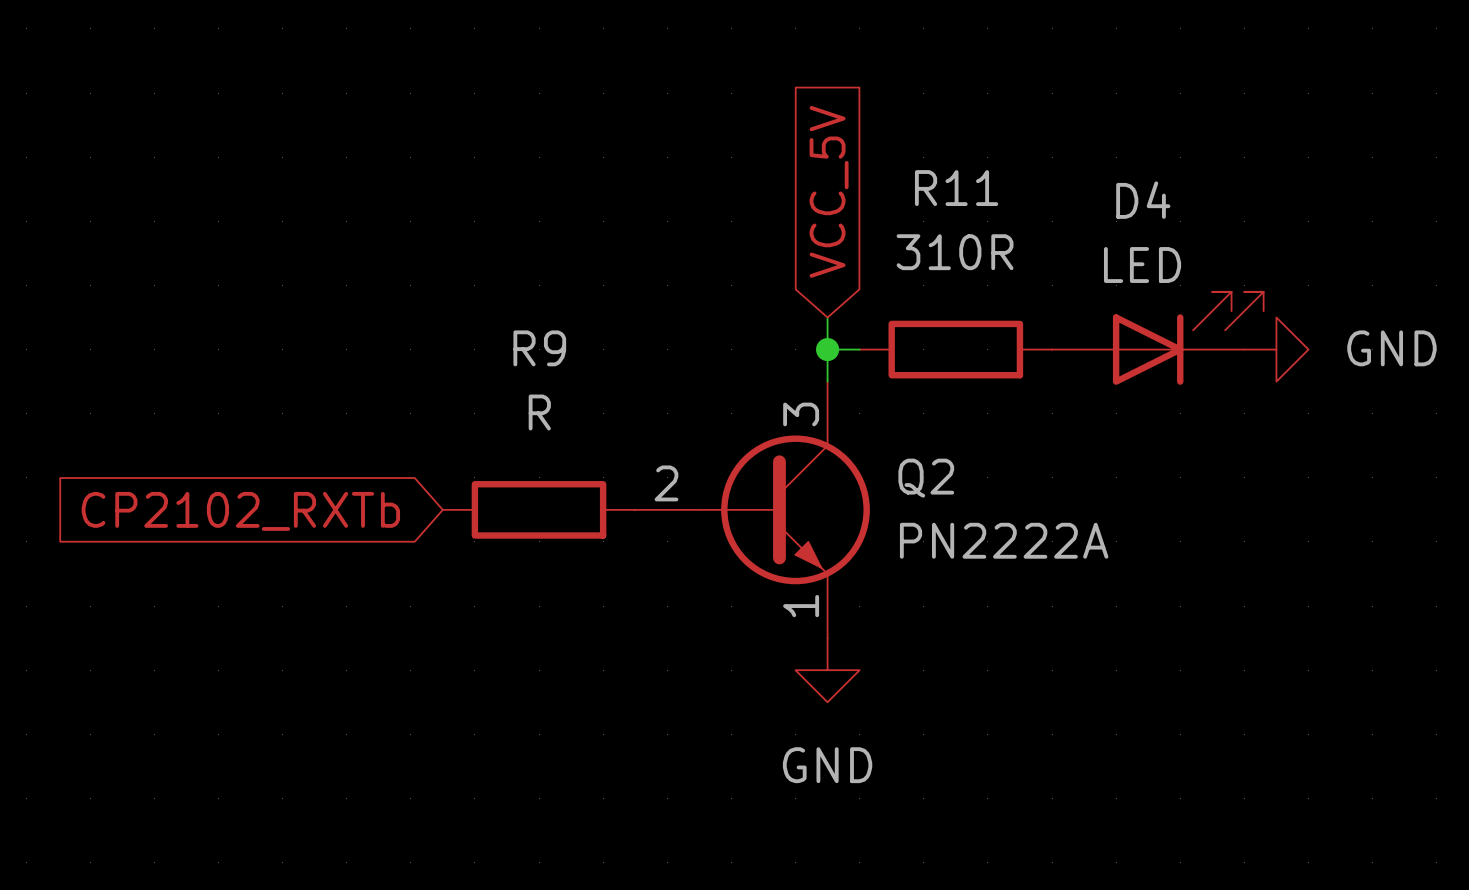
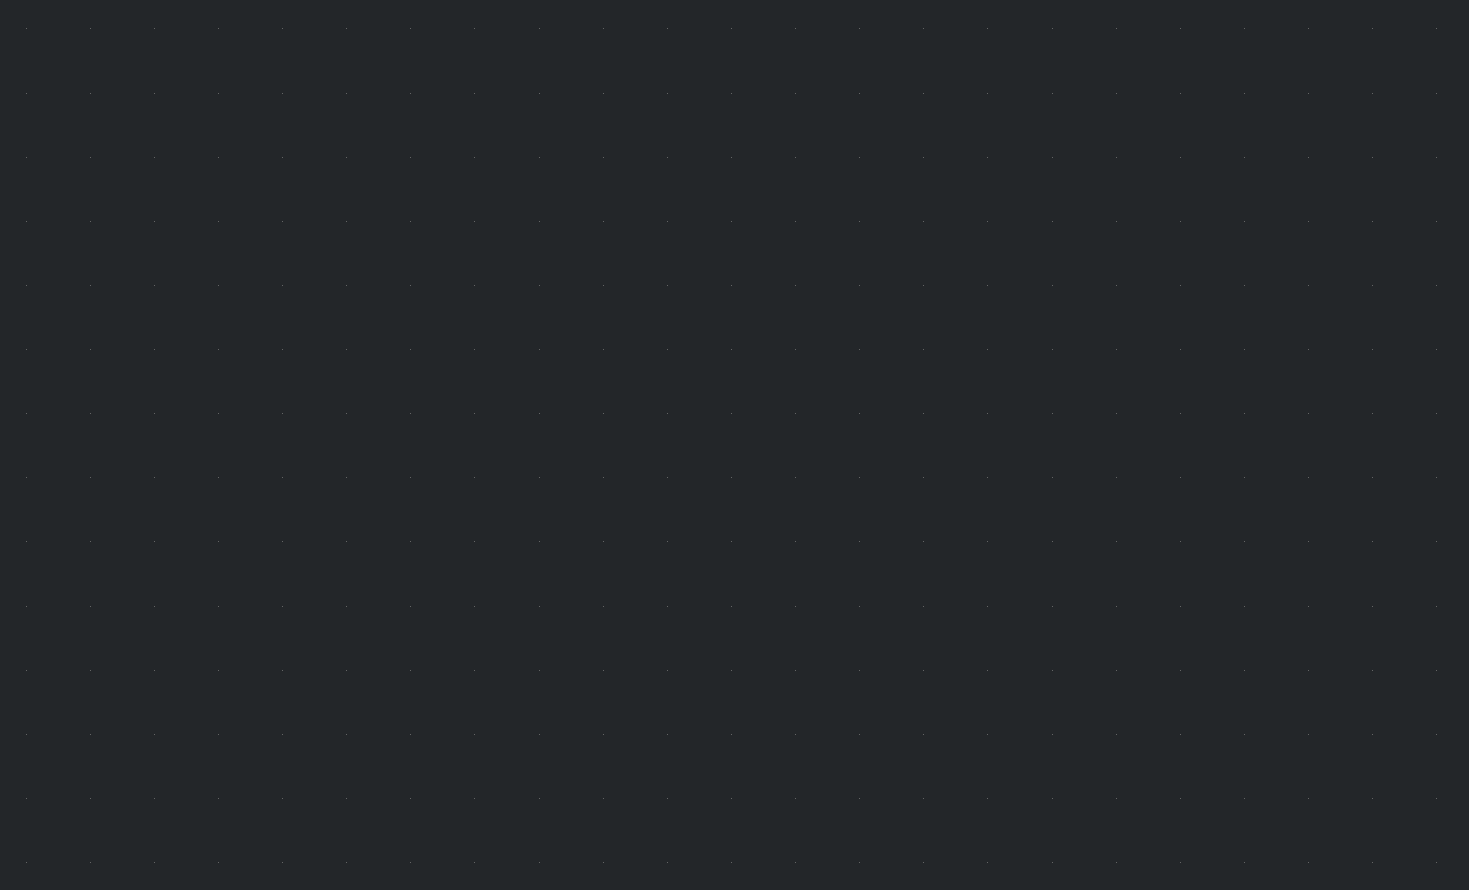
global label: VCC_5V (829, 191) -> none
wire: (827, 317) (827, 381) -> none
D4: LED (1157, 338) -> none
wire: (827, 349) (859, 349) -> none
junction: (827, 349) -> none
R11: 310R (955, 349) -> none
power symbol: GND (1276, 349) -> none
R9: R (539, 509) -> none
Q2: PN2222A (752, 509) -> none
global label: CP2102_RXTb (240, 511) -> none
power symbol: GND (827, 670) -> none

